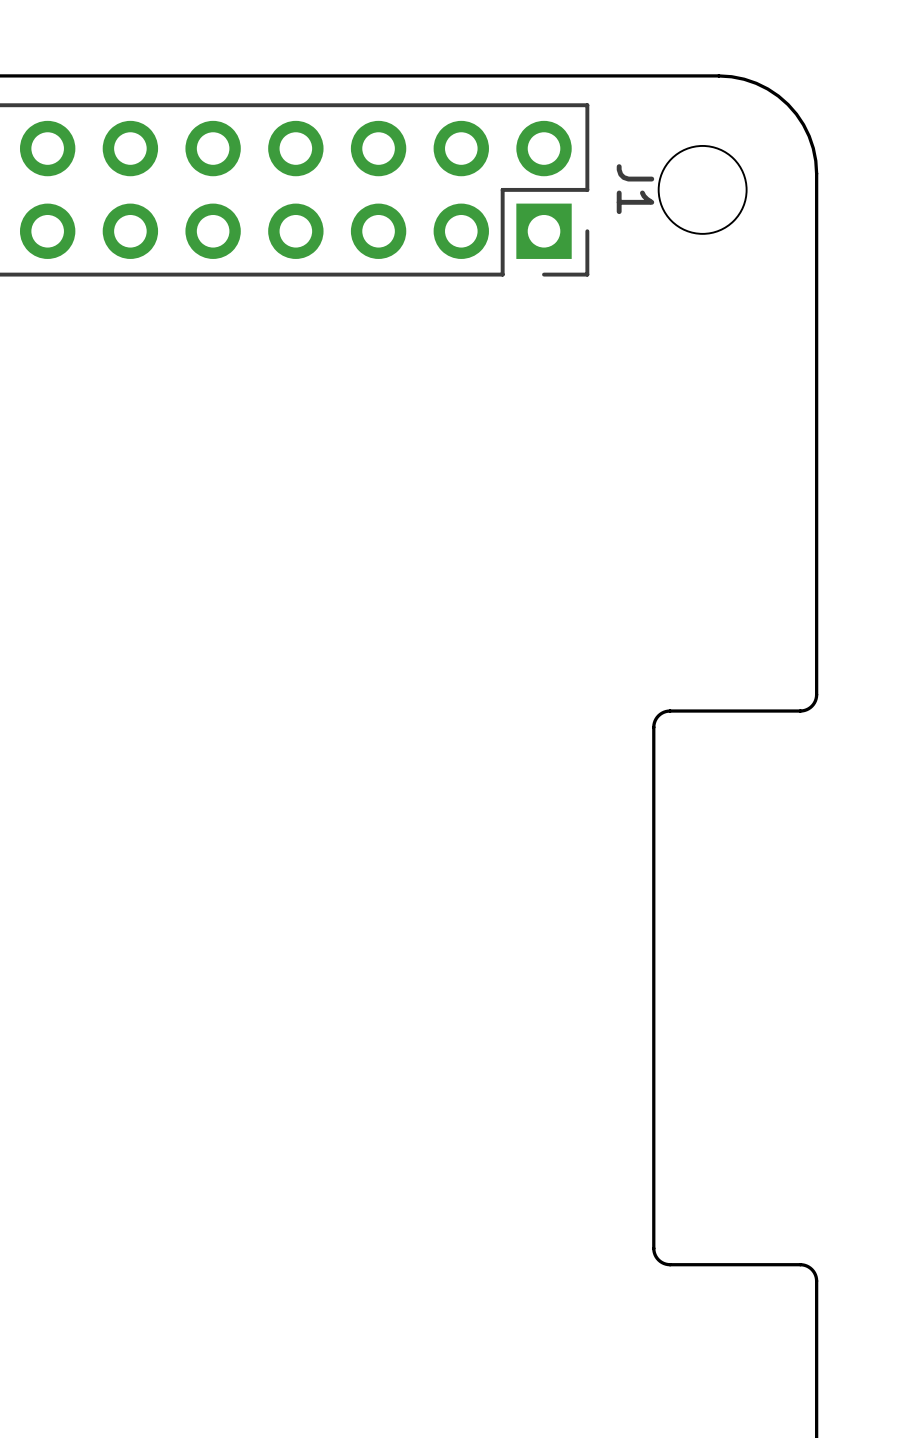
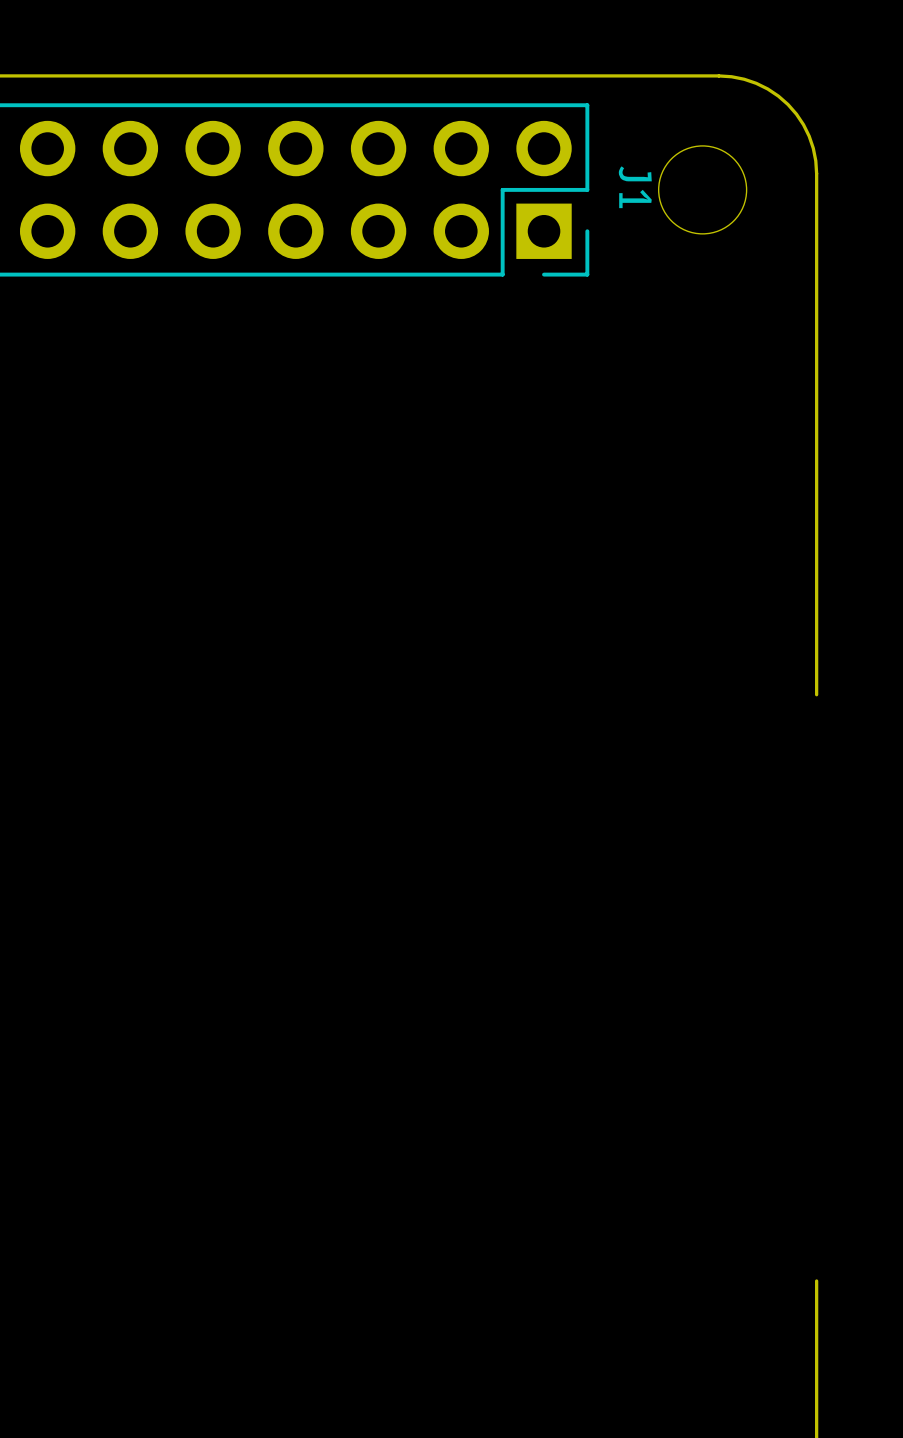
board edge: (816, 694) (811, 706) (802, 710) (665, 711) (657, 717) (653, 727) (654, 1252) (660, 1261) (667, 1264) (802, 1264) (813, 1271) (816, 1280) -> none

